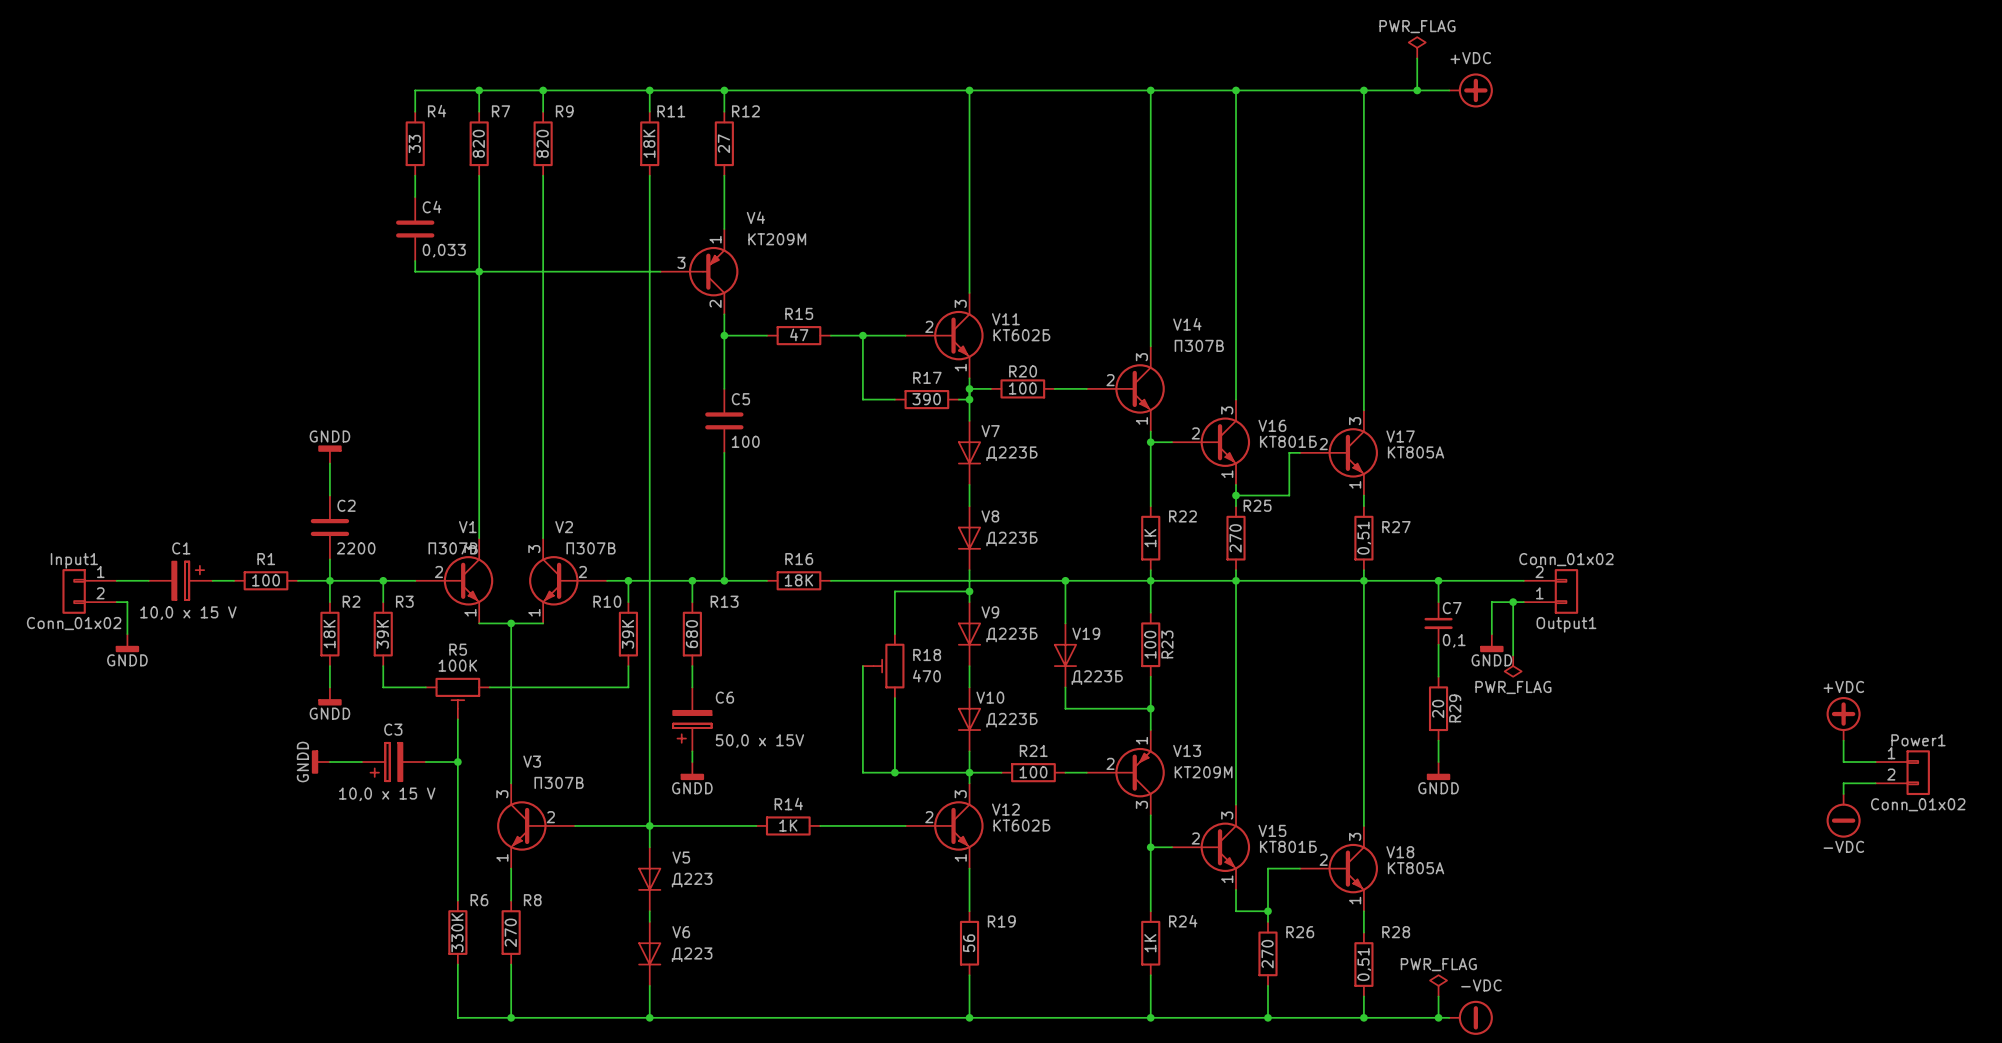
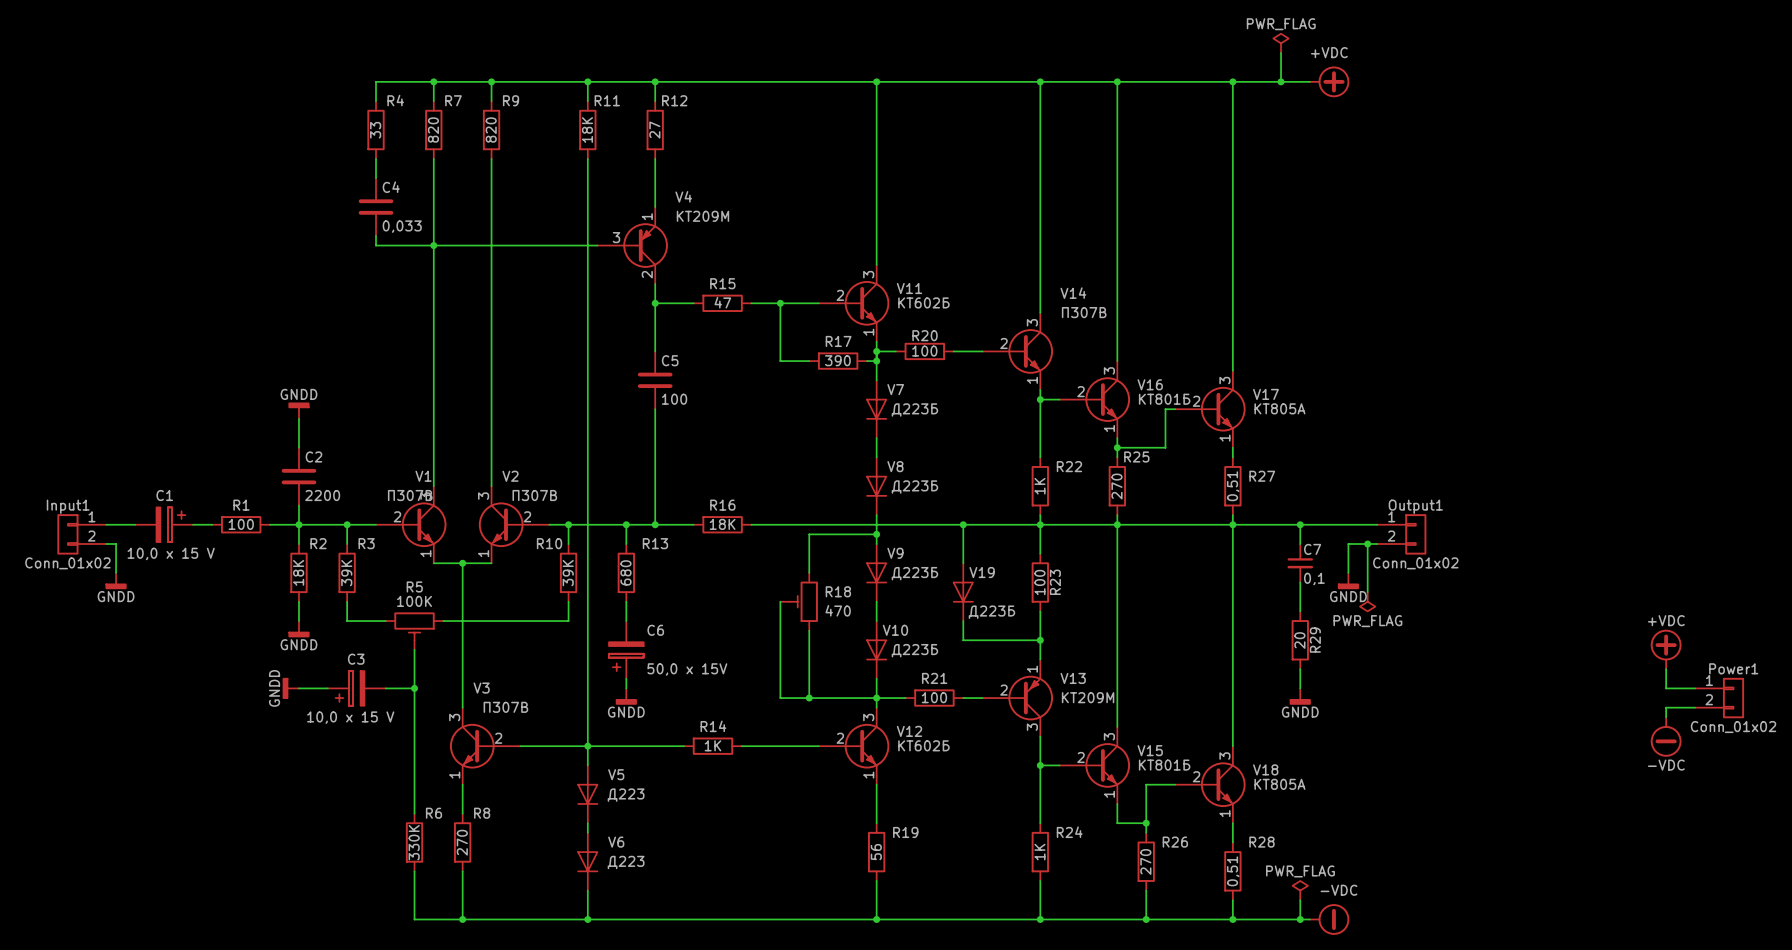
Output1 flip: as is (1566, 591) -> up-down (1415, 534)

